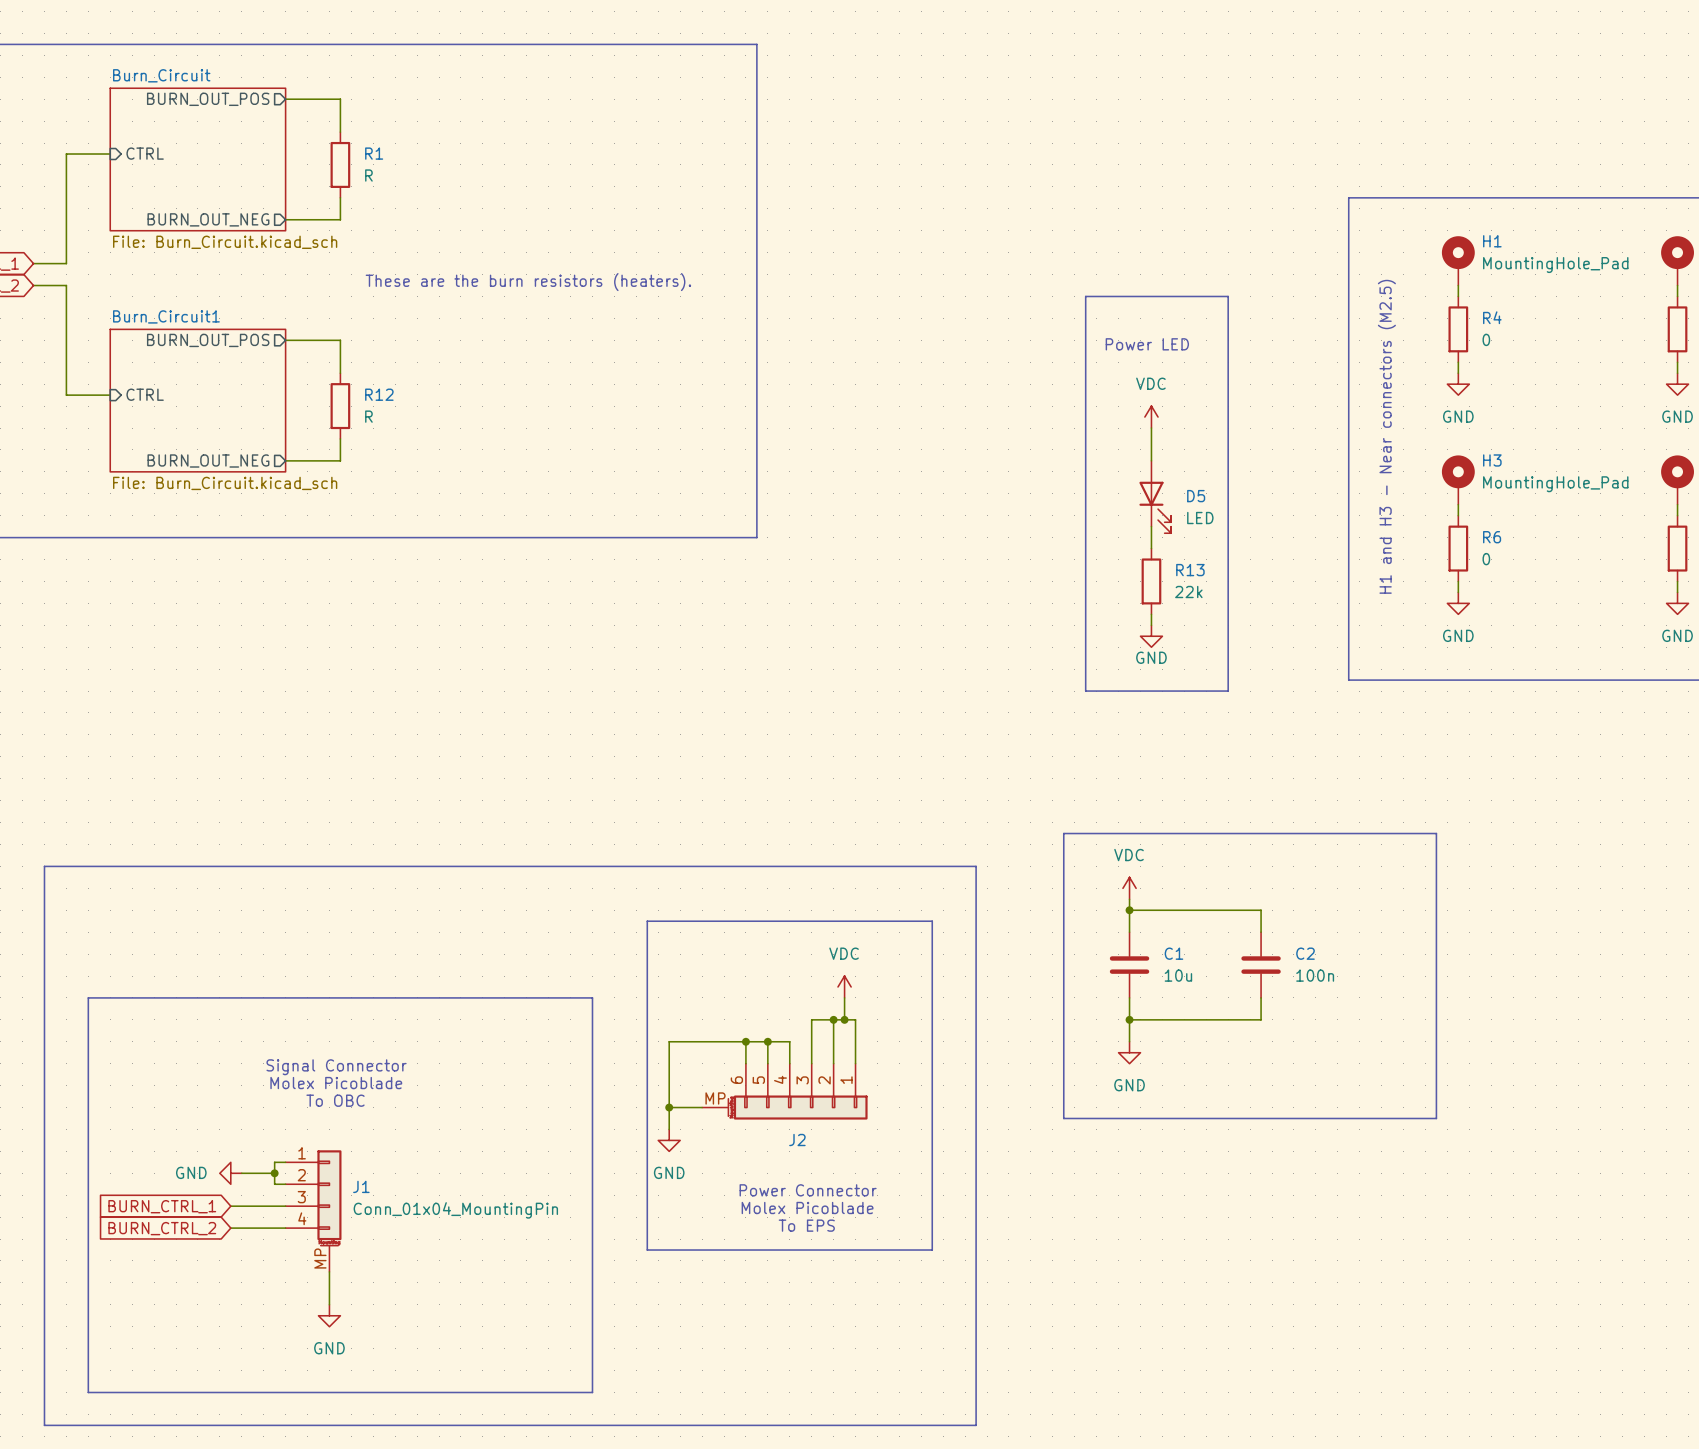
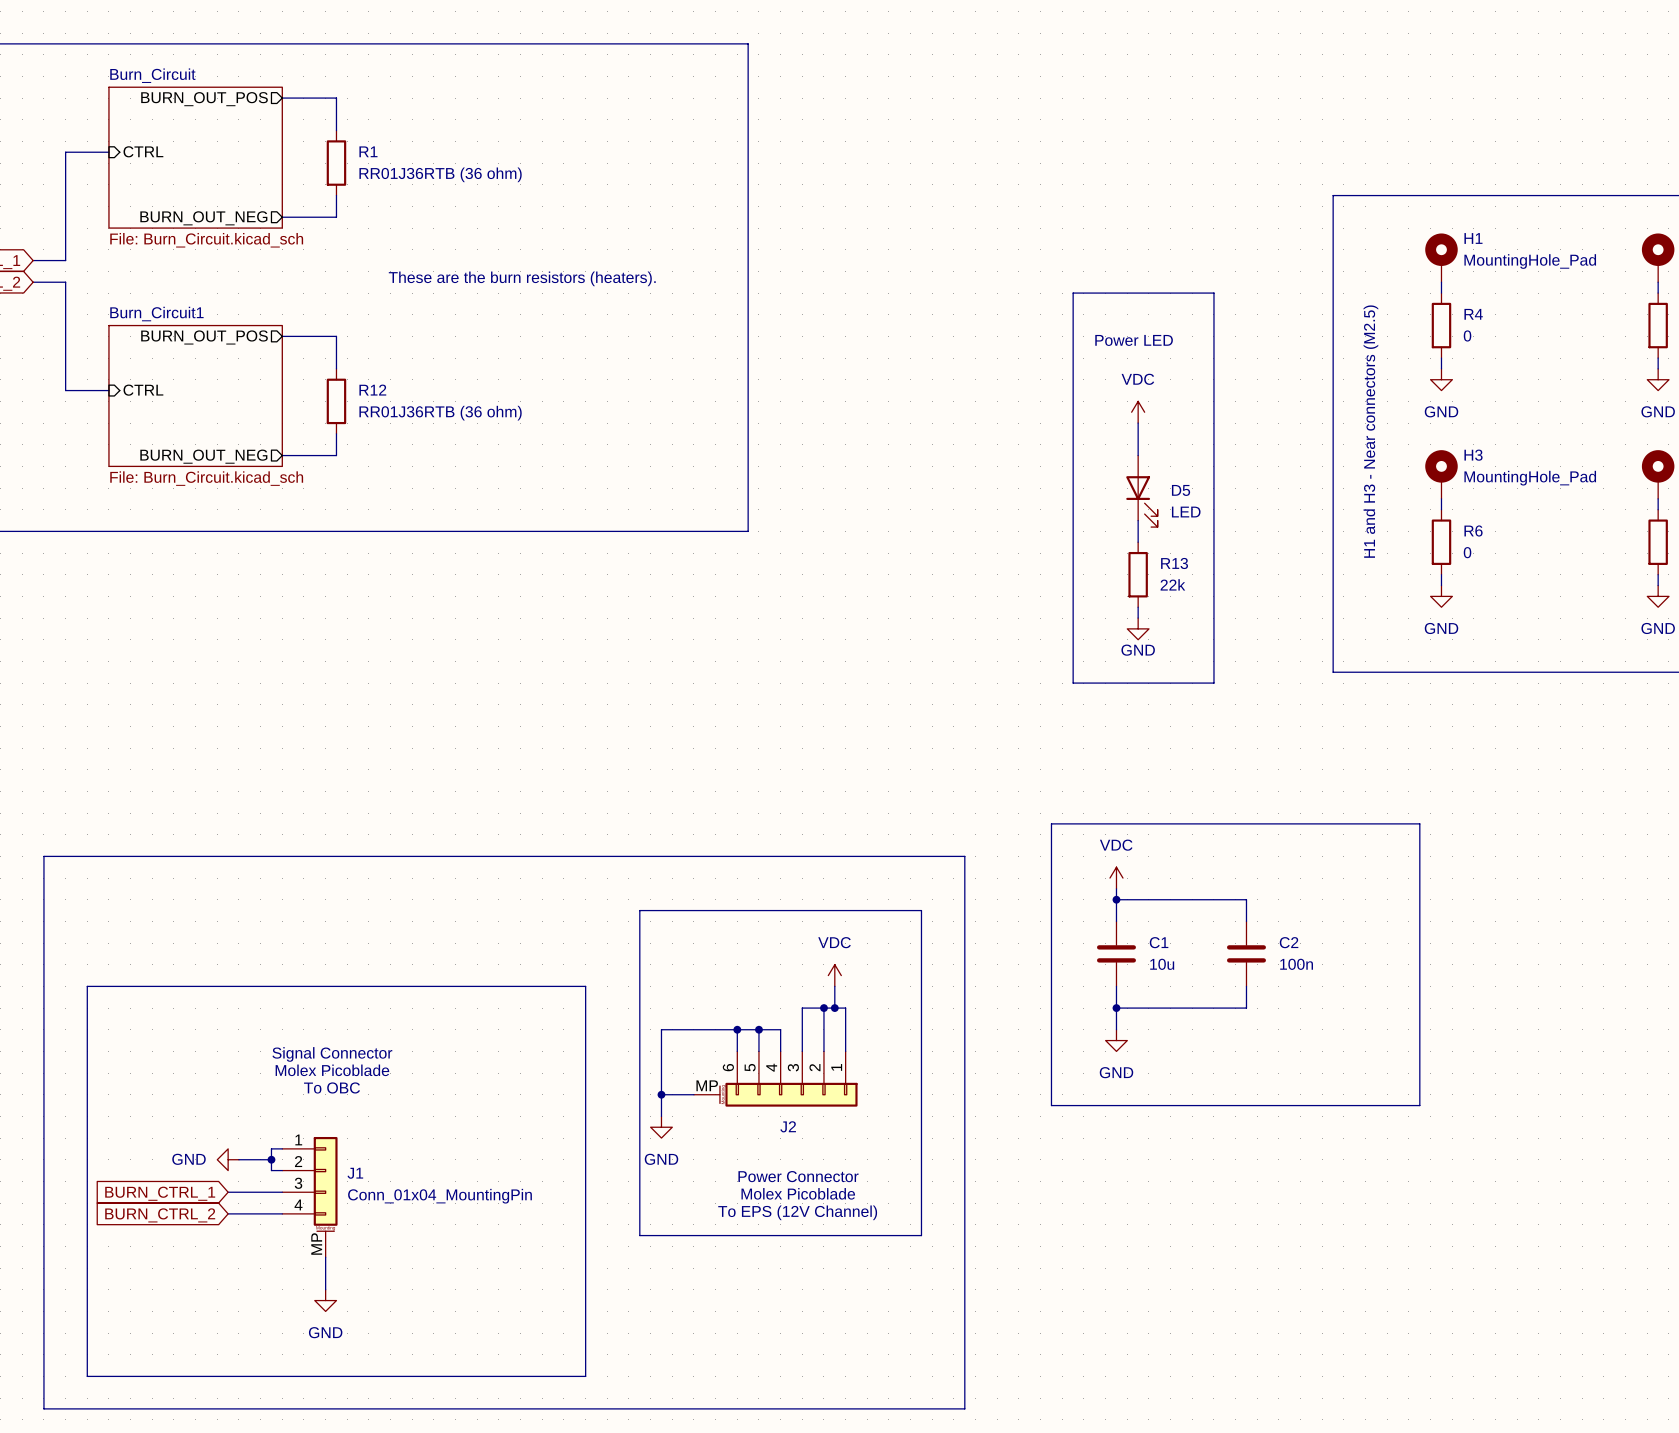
R1 value: R (368, 175) -> RR01J36RTB (36 ohm) (440, 174)
R12 value: R (368, 416) -> RR01J36RTB (36 ohm) (440, 413)
text: To EPS (806, 1225) -> To EPS (12V Channel) (797, 1212)

